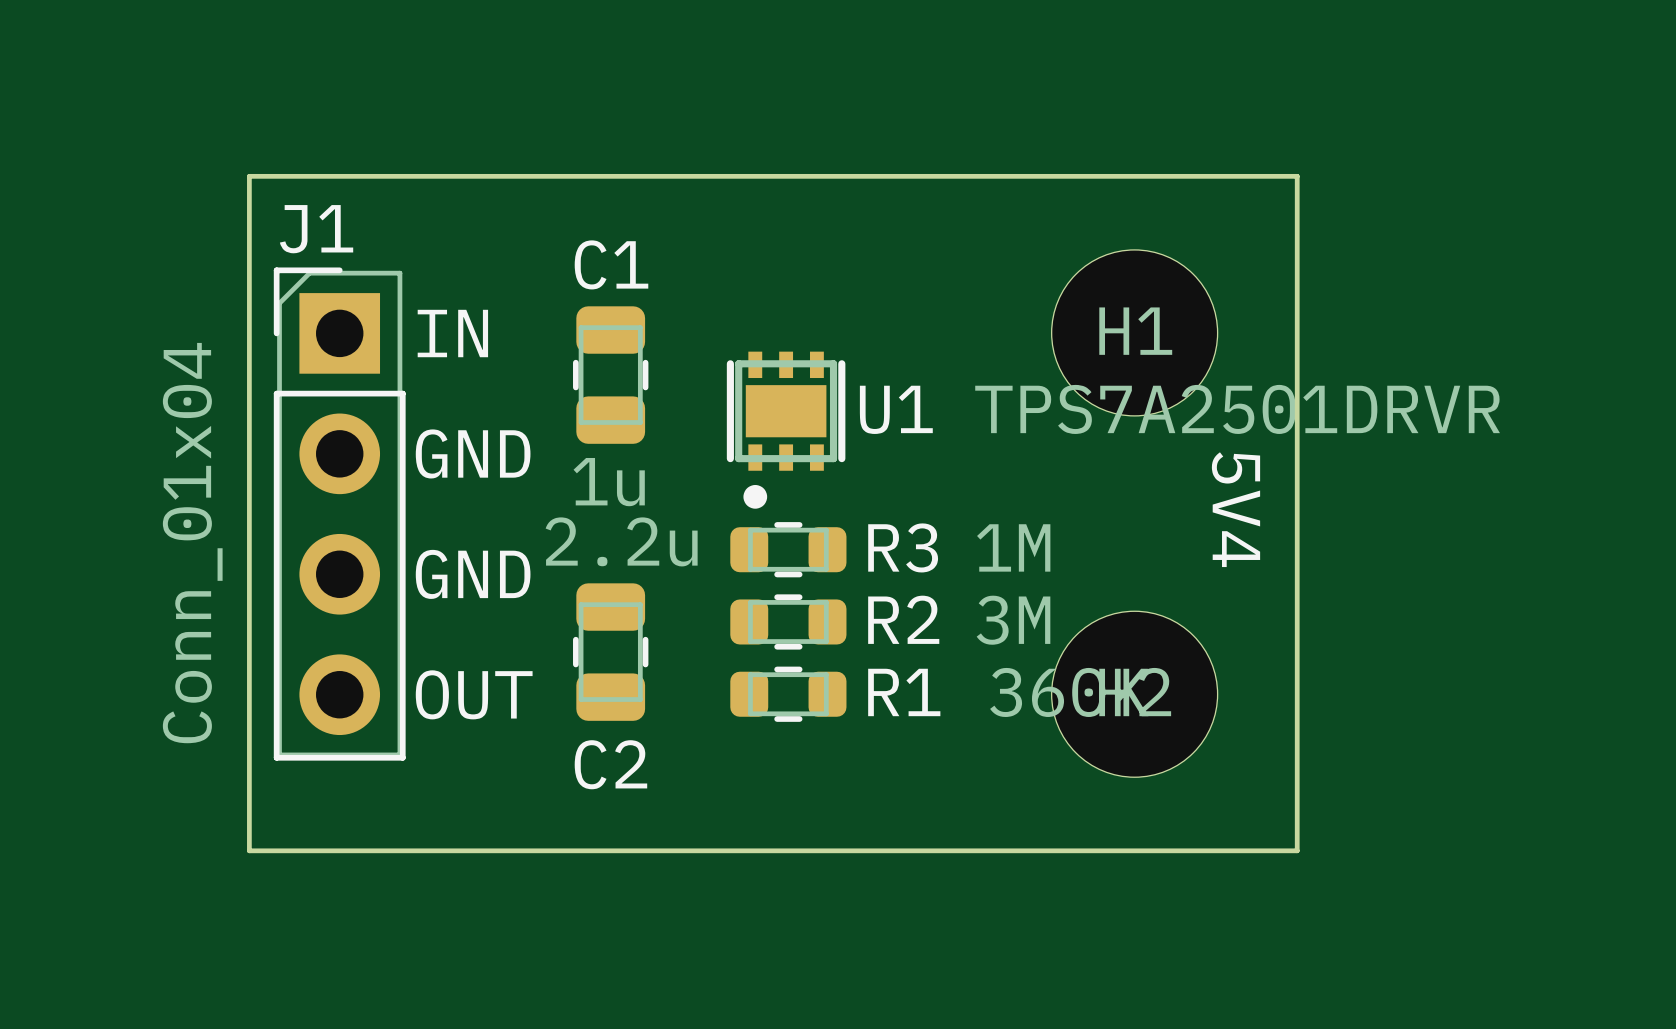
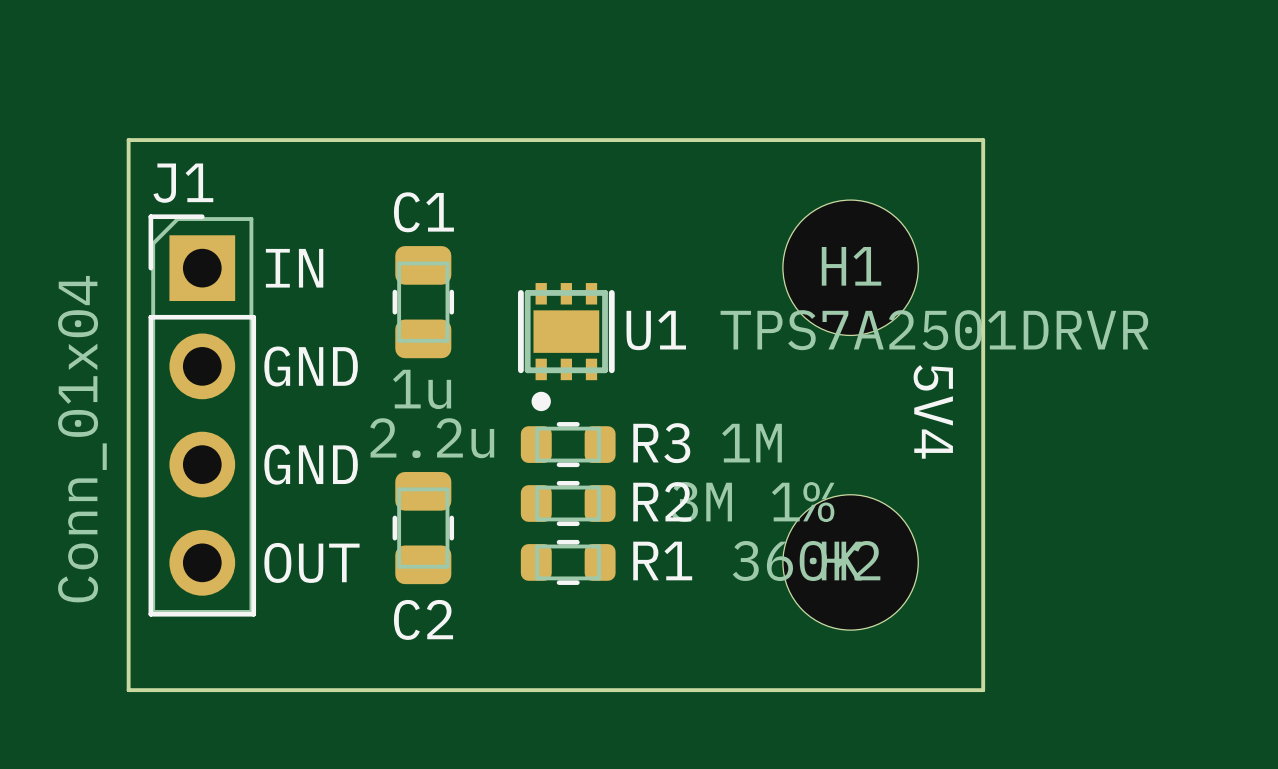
R2 value: 3M (1013, 620) -> 3M 1% (753, 502)

